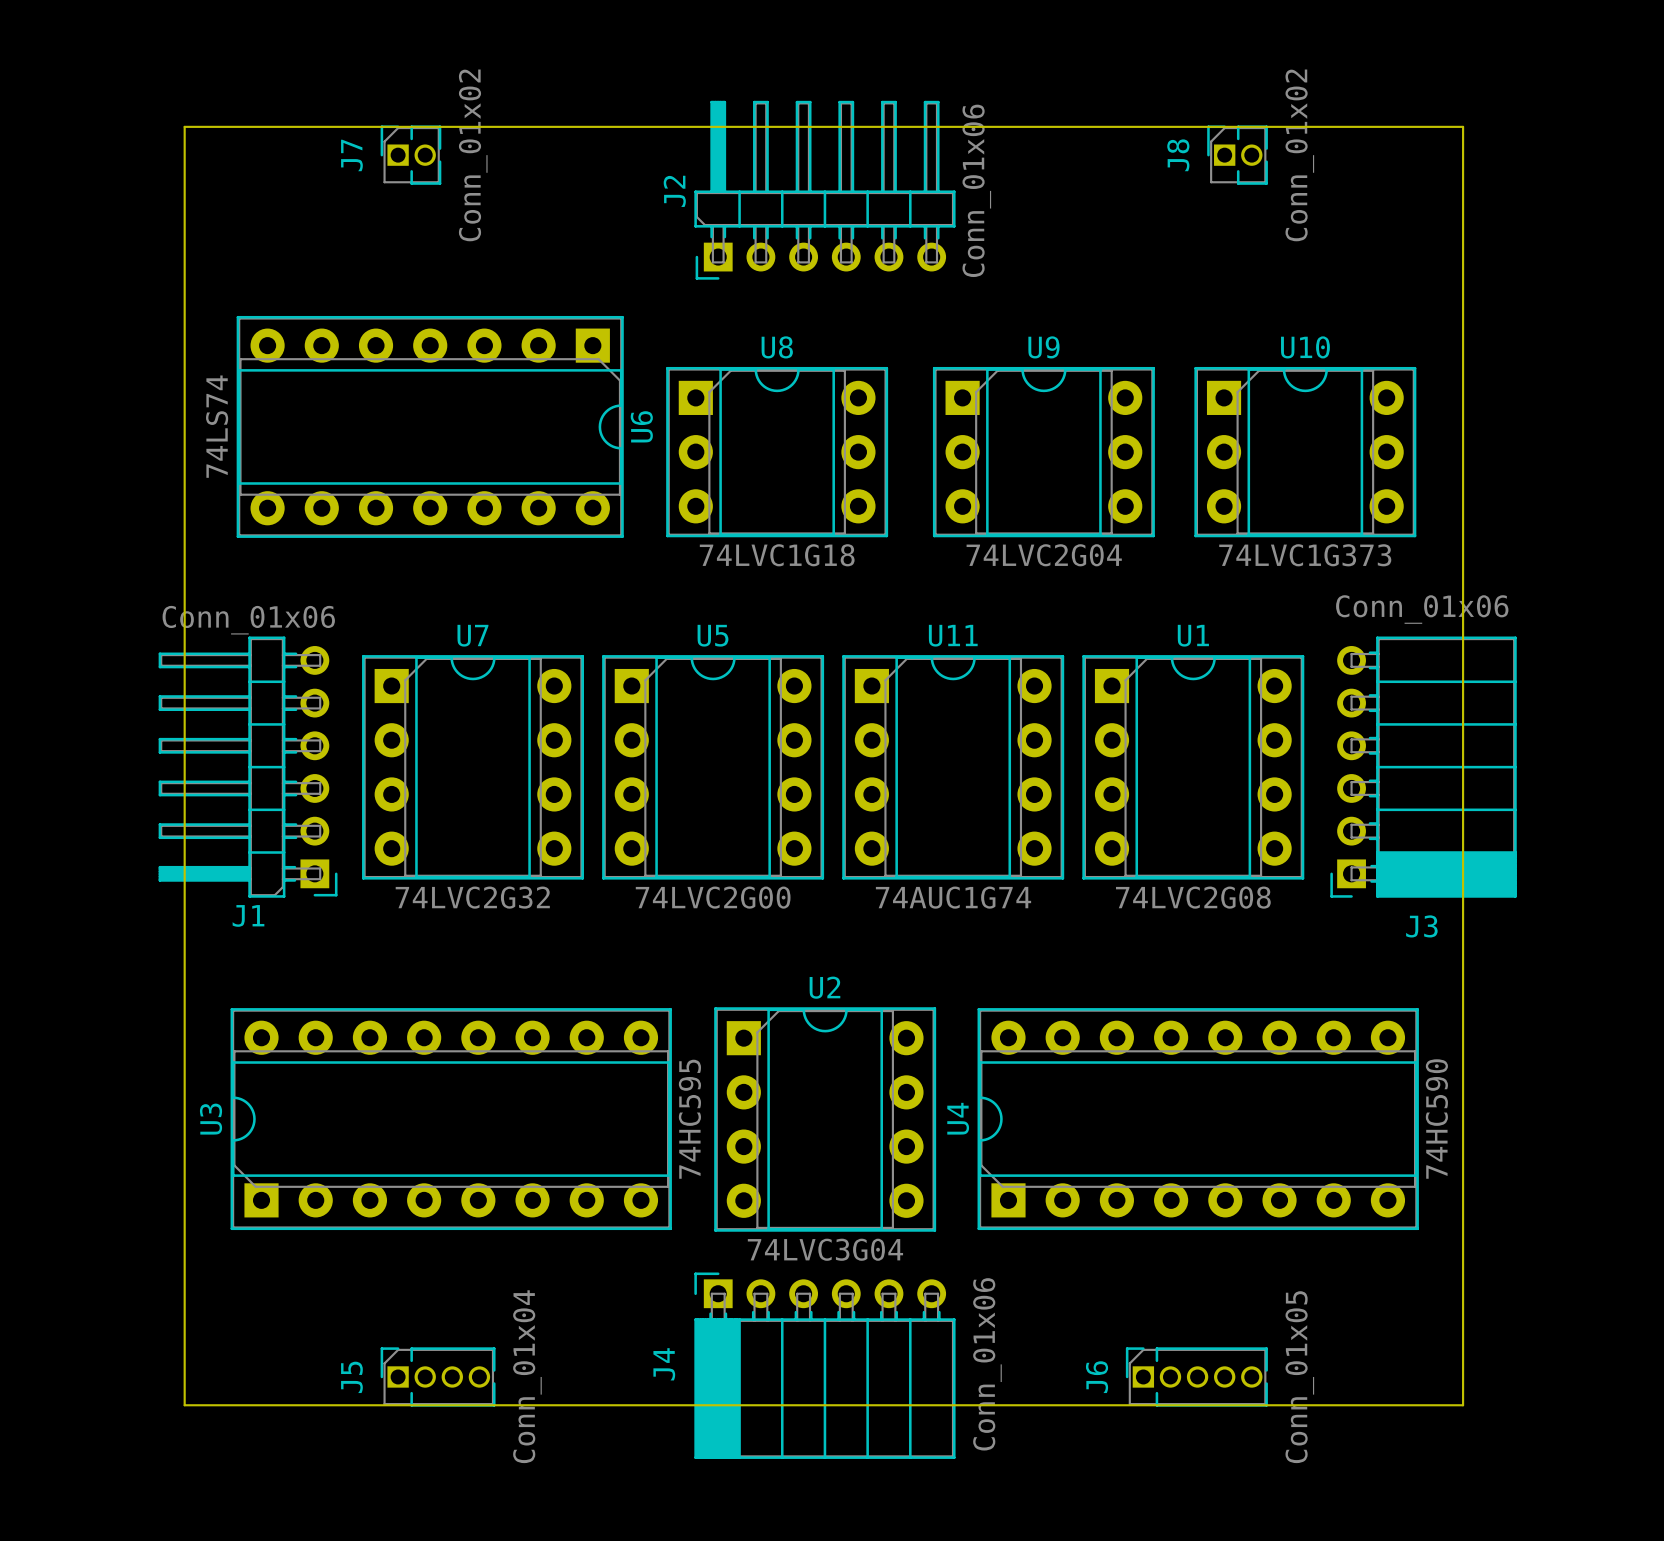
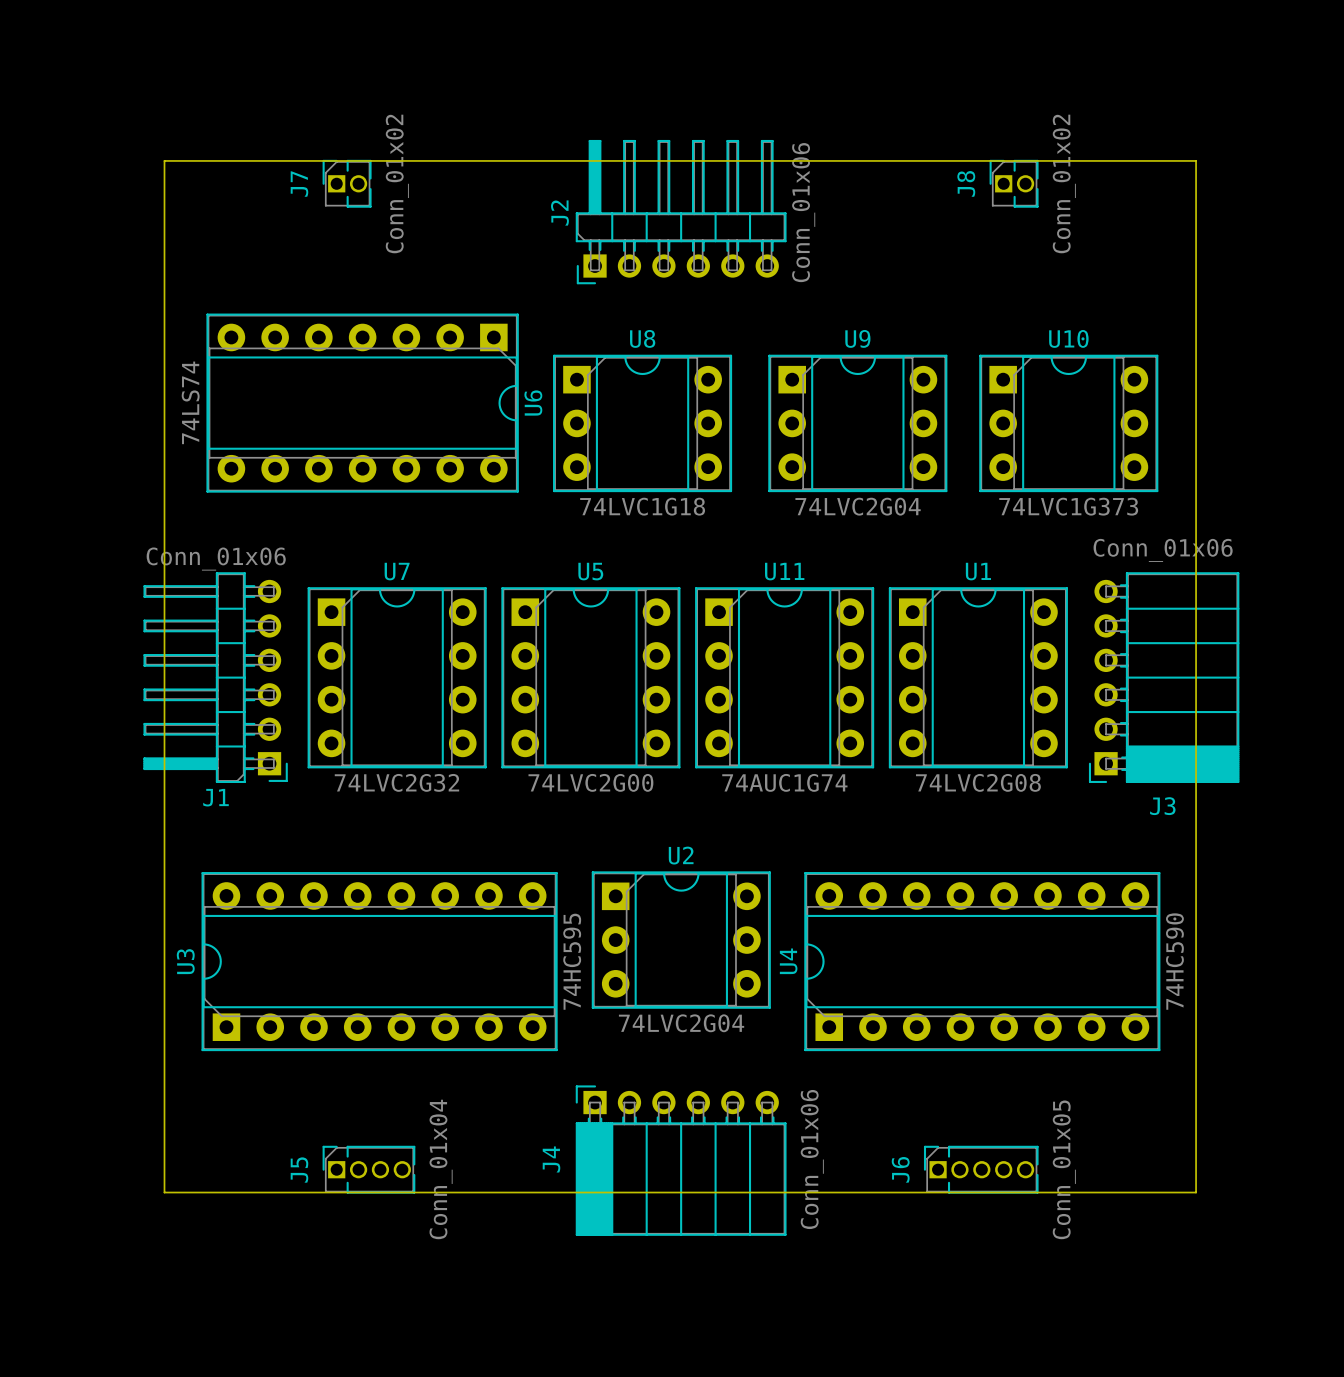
U2 footprint: [714, 1007, 937, 1232] -> [591, 871, 771, 1009]
U2 value: 74LVC3G04 (825, 1249) -> 74LVC2G04 (681, 1023)

